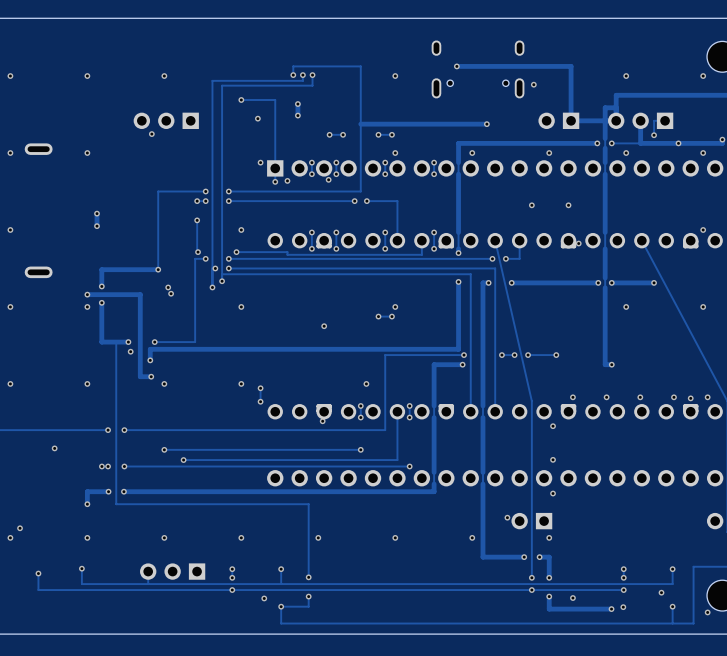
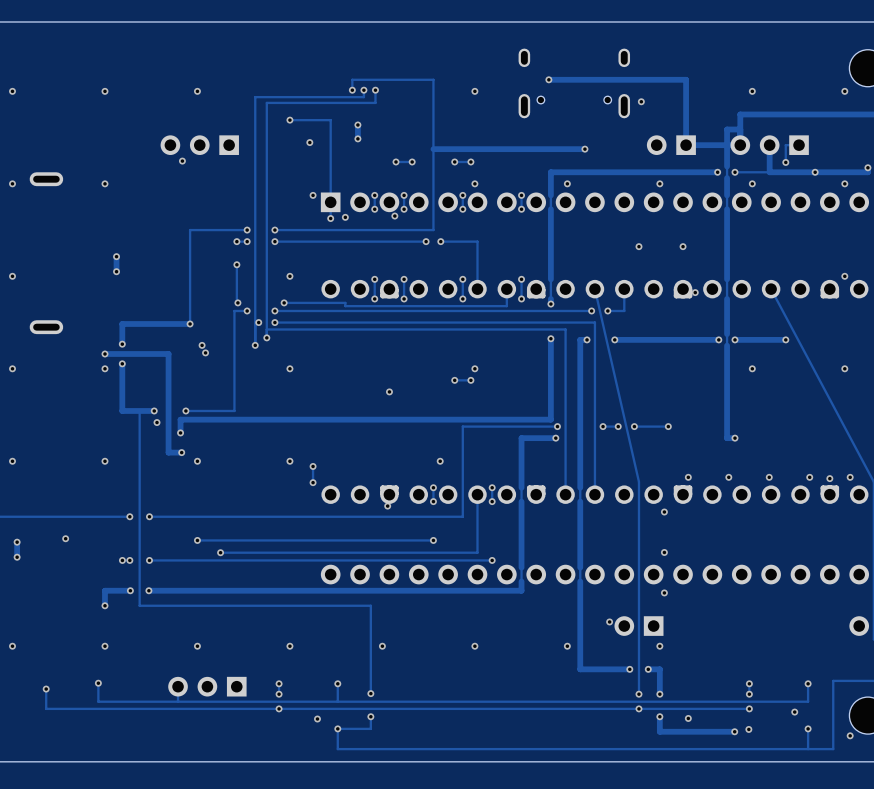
track: none -> (17, 542) (17, 557)
via: none -> (17, 542)
via: none -> (17, 557)
via: (20, 528) -> none

